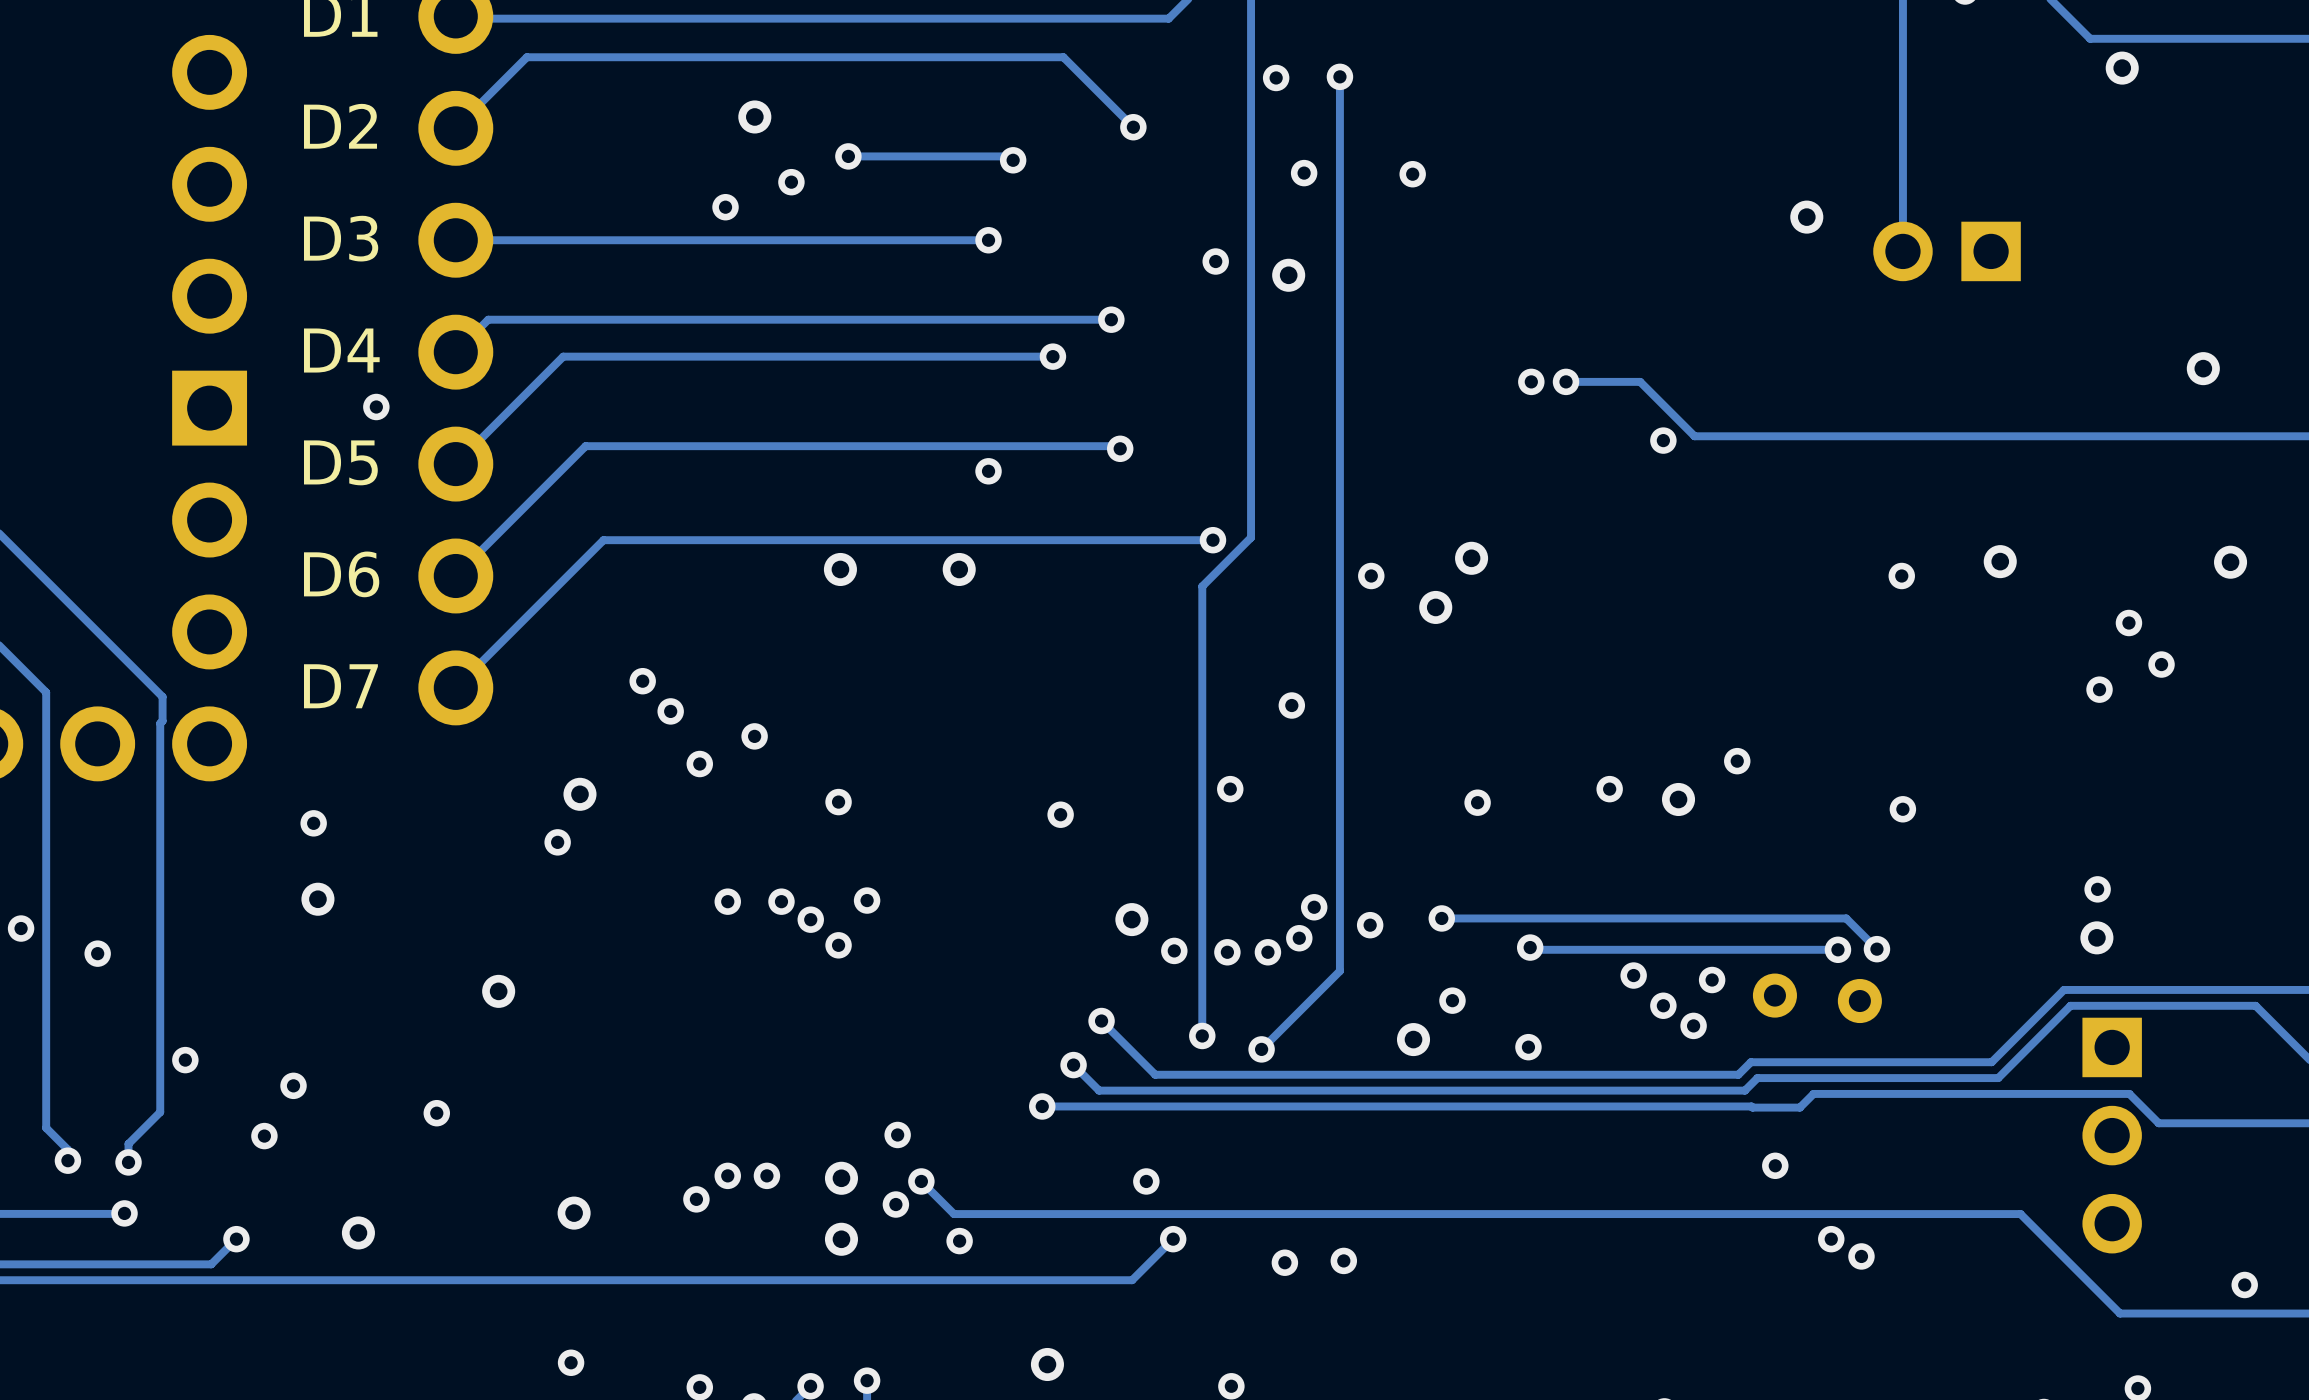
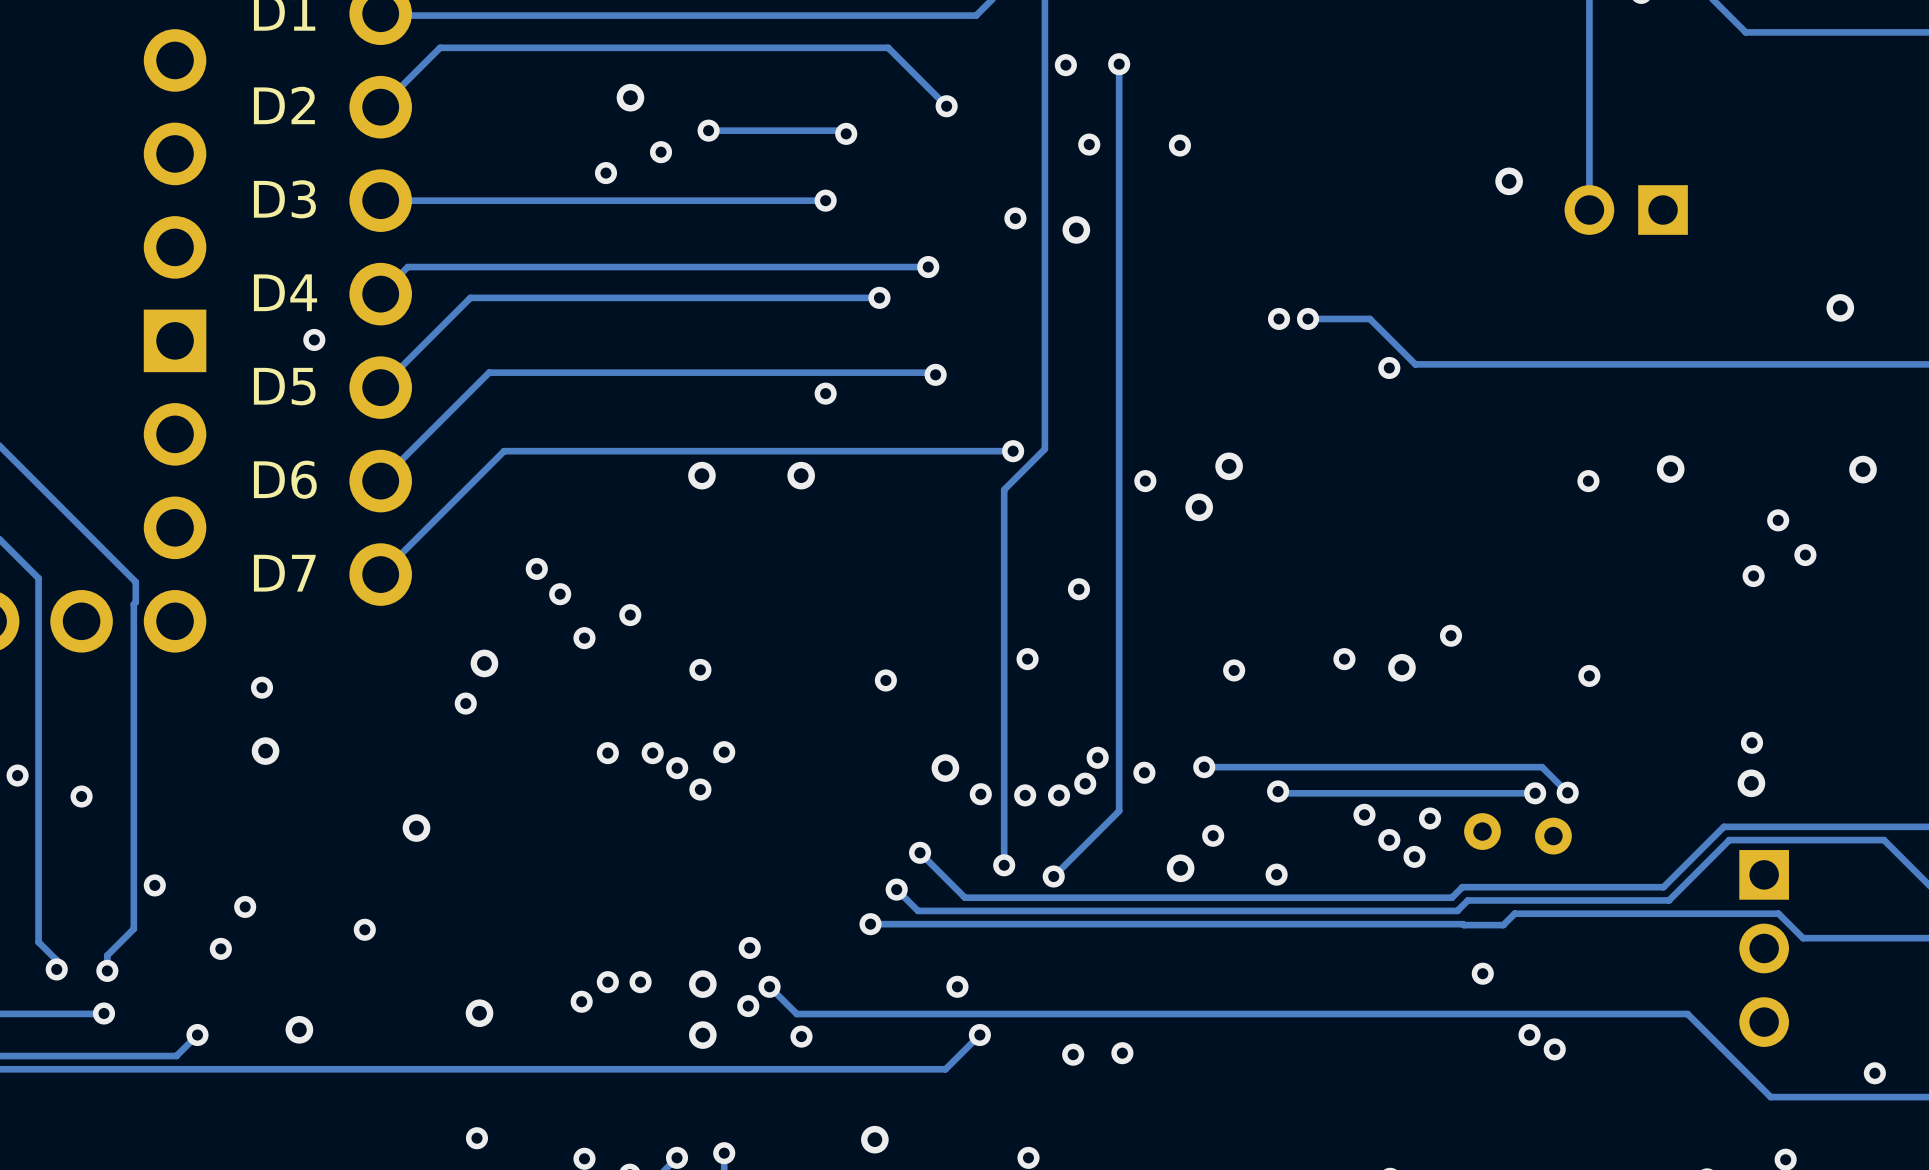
via: (2122, 68) -> none

